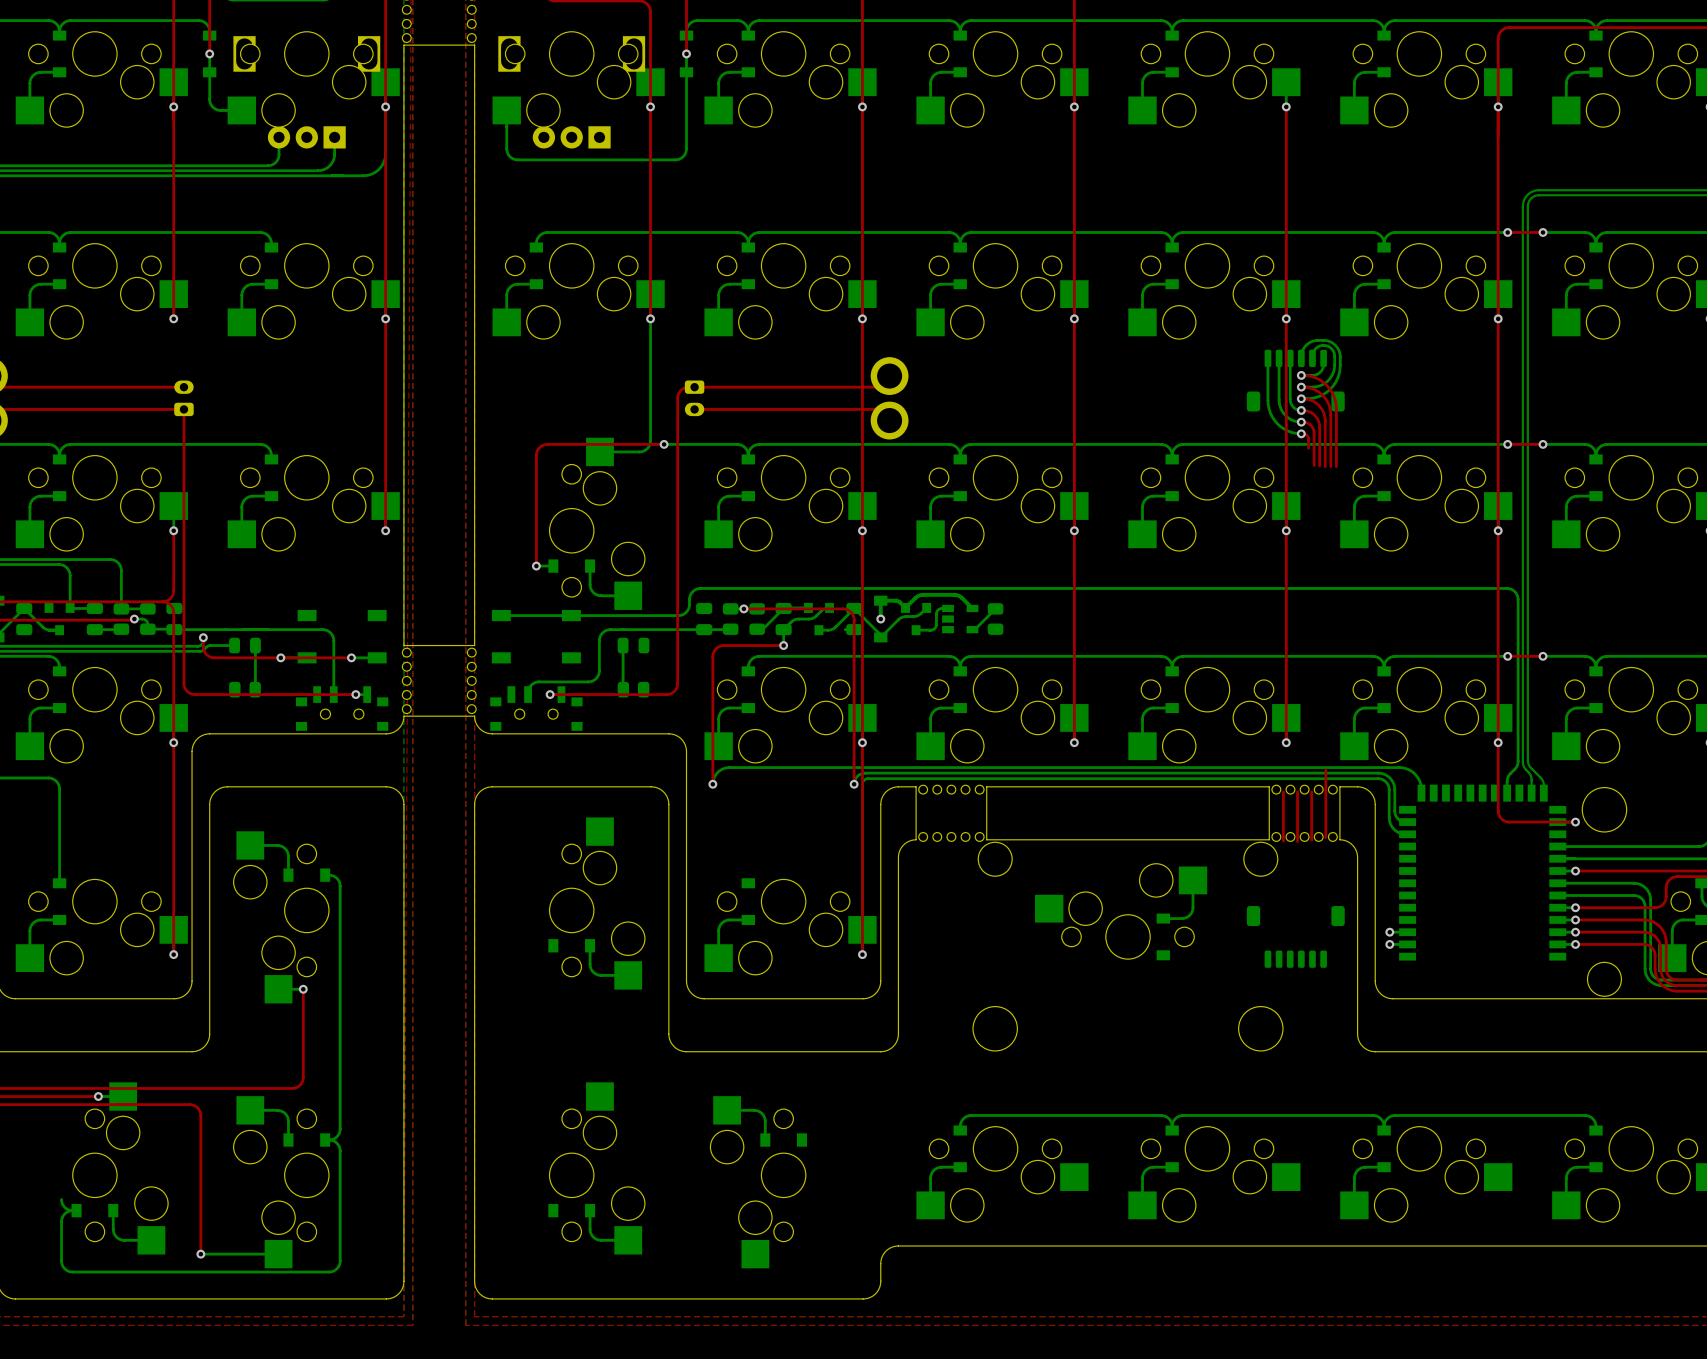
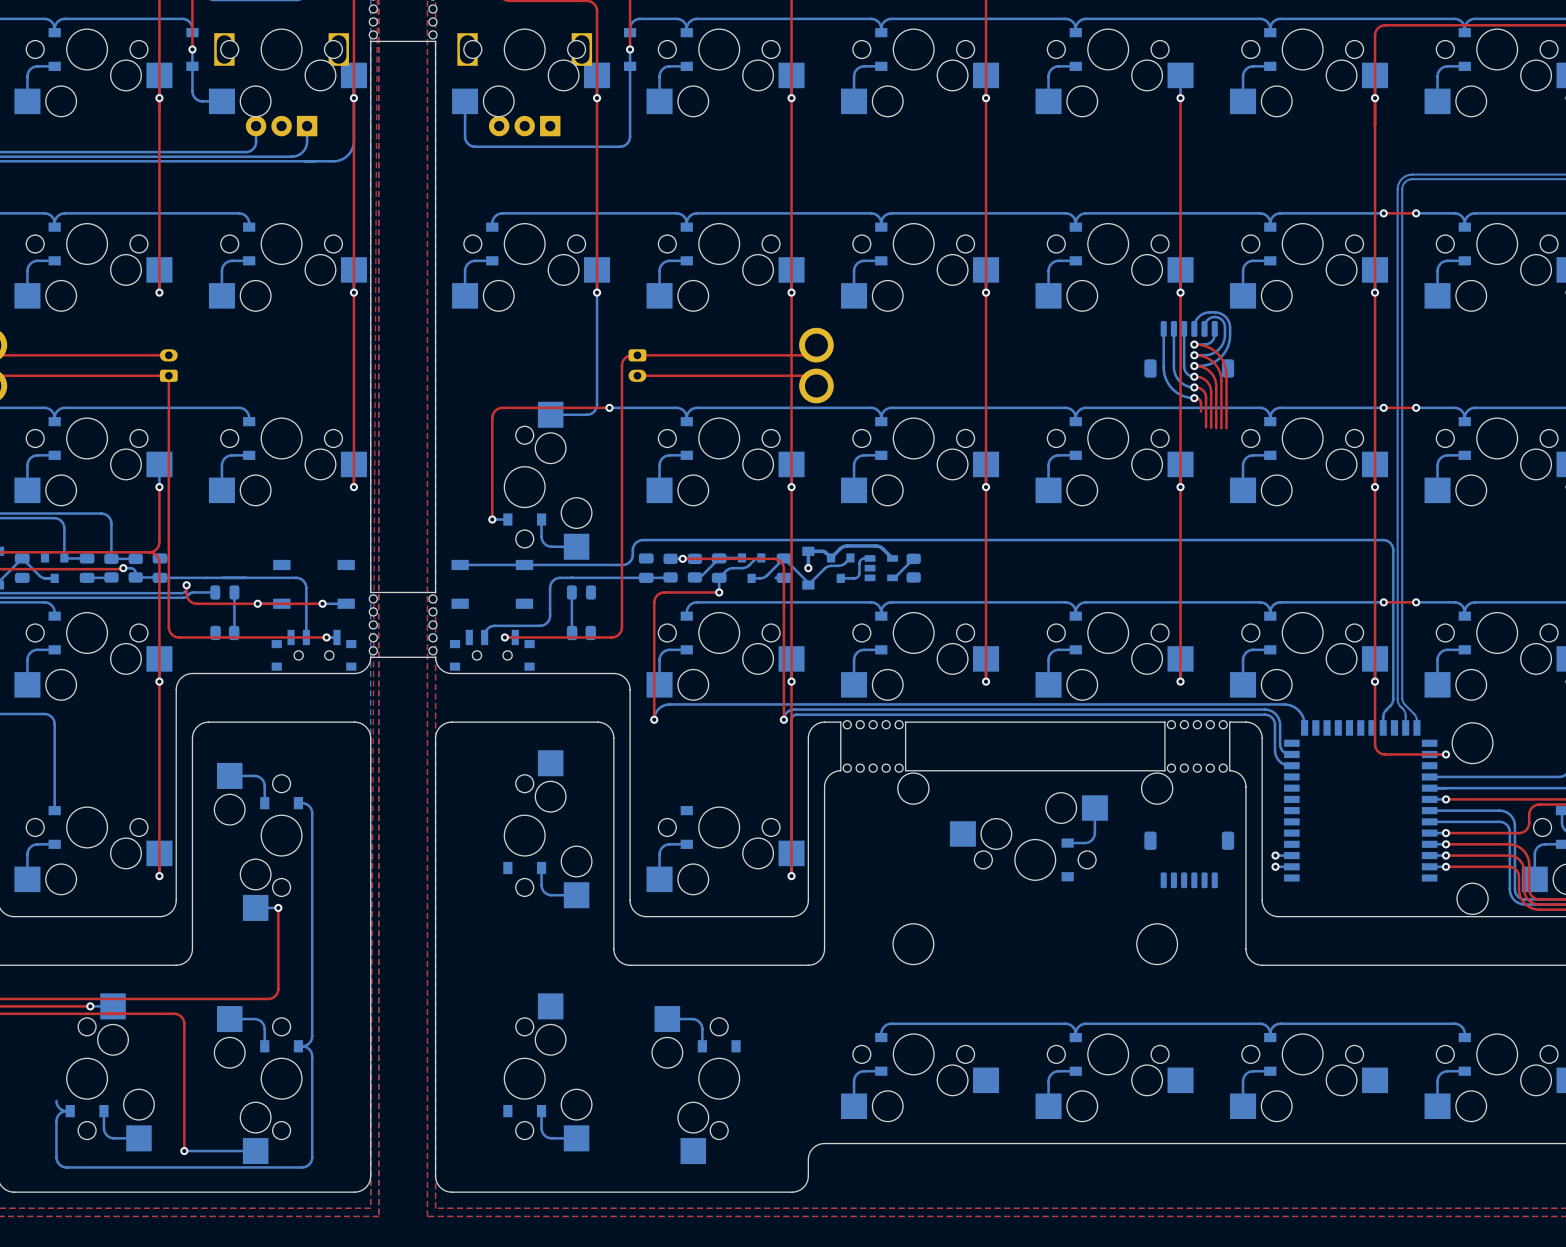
top track: (1325, 769) (1325, 837) -> none
top track: (1283, 792) (1283, 841) -> none
top track: (1297, 792) (1297, 841) -> none
top track: (1311, 792) (1311, 840) -> none

